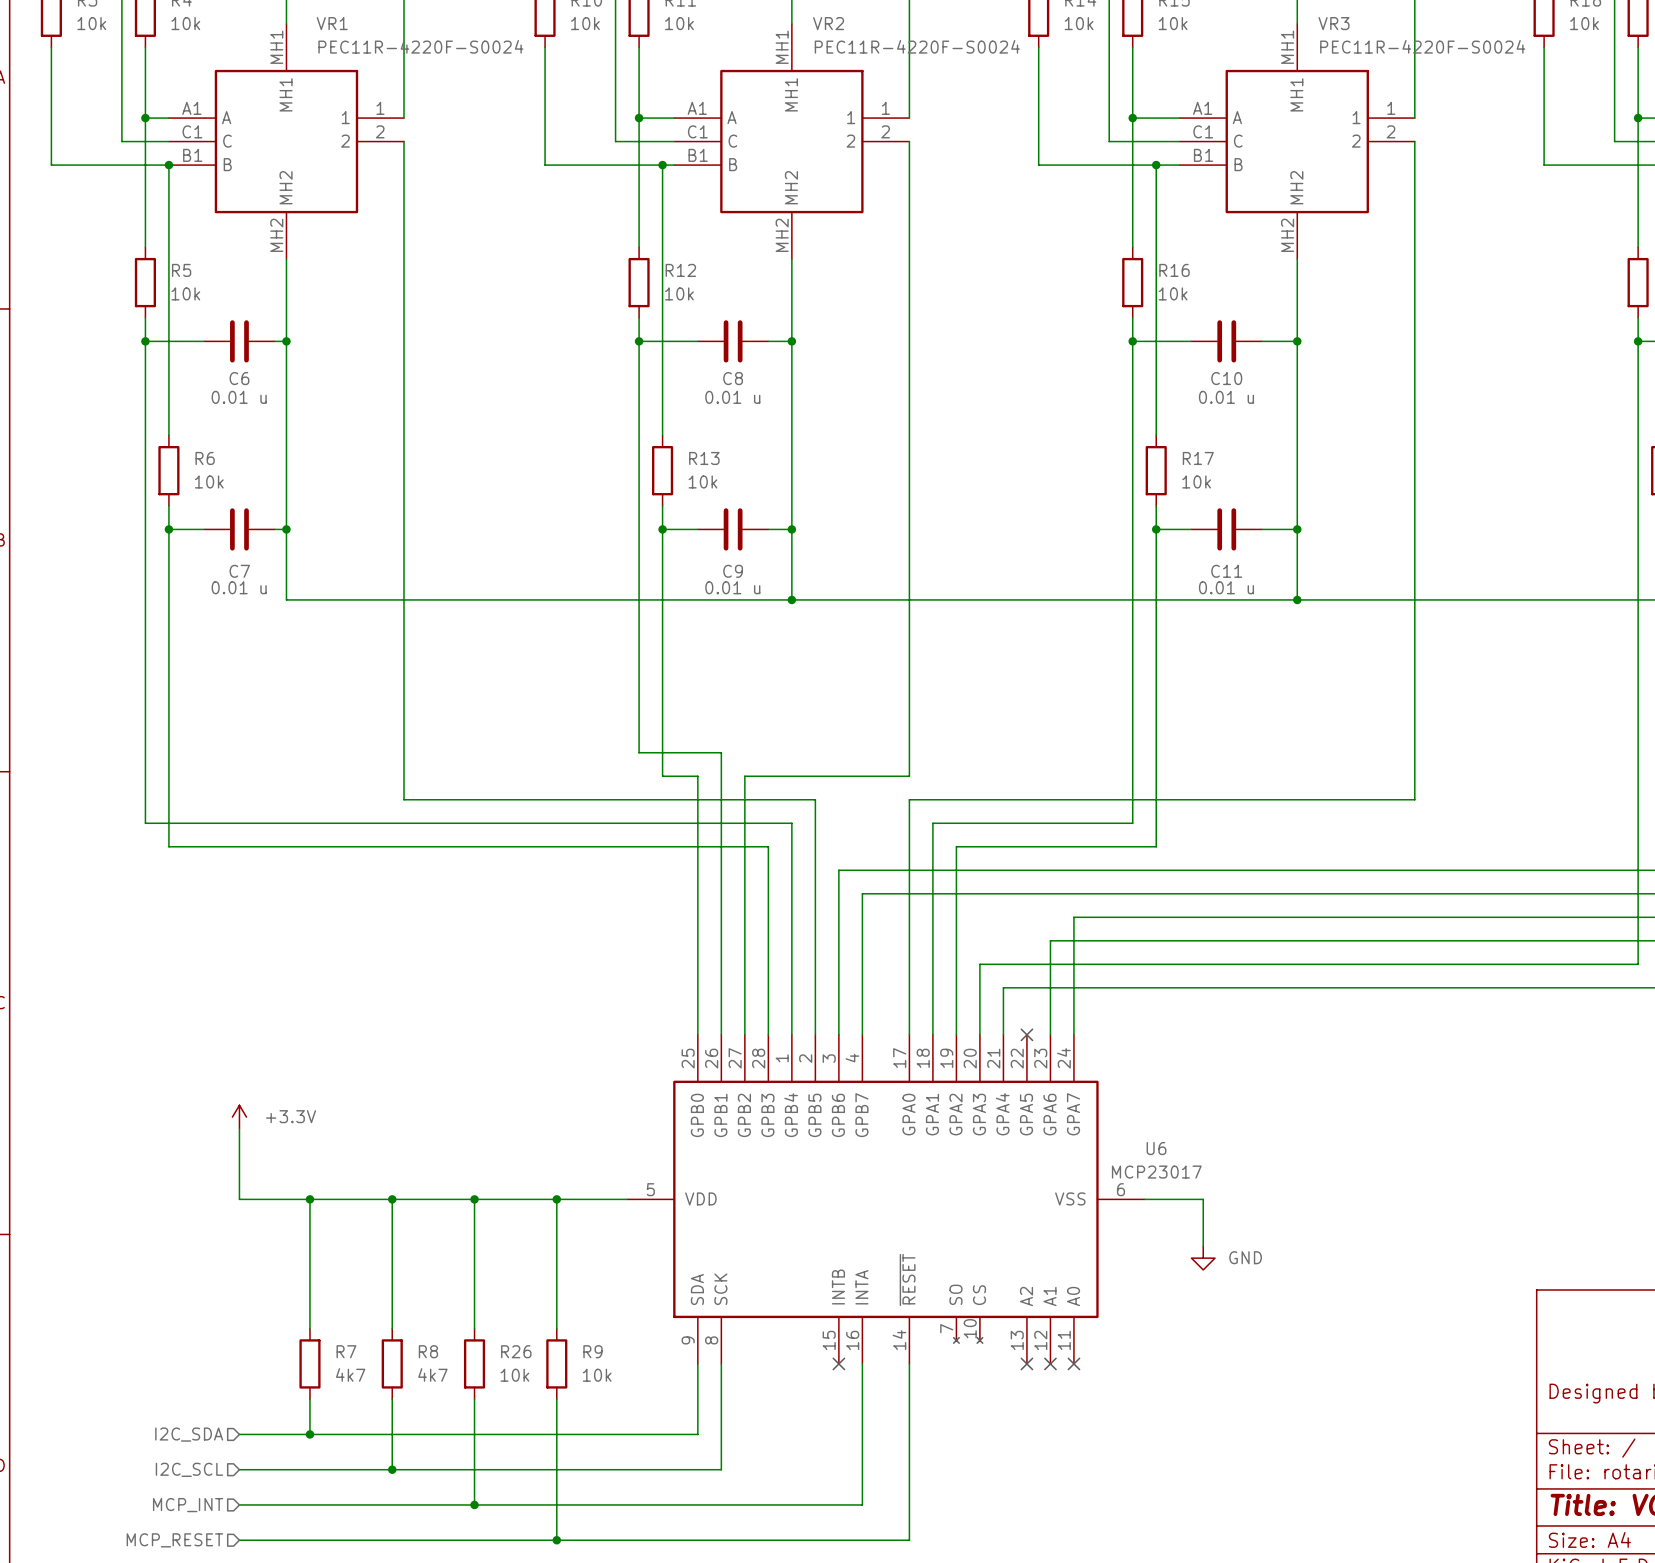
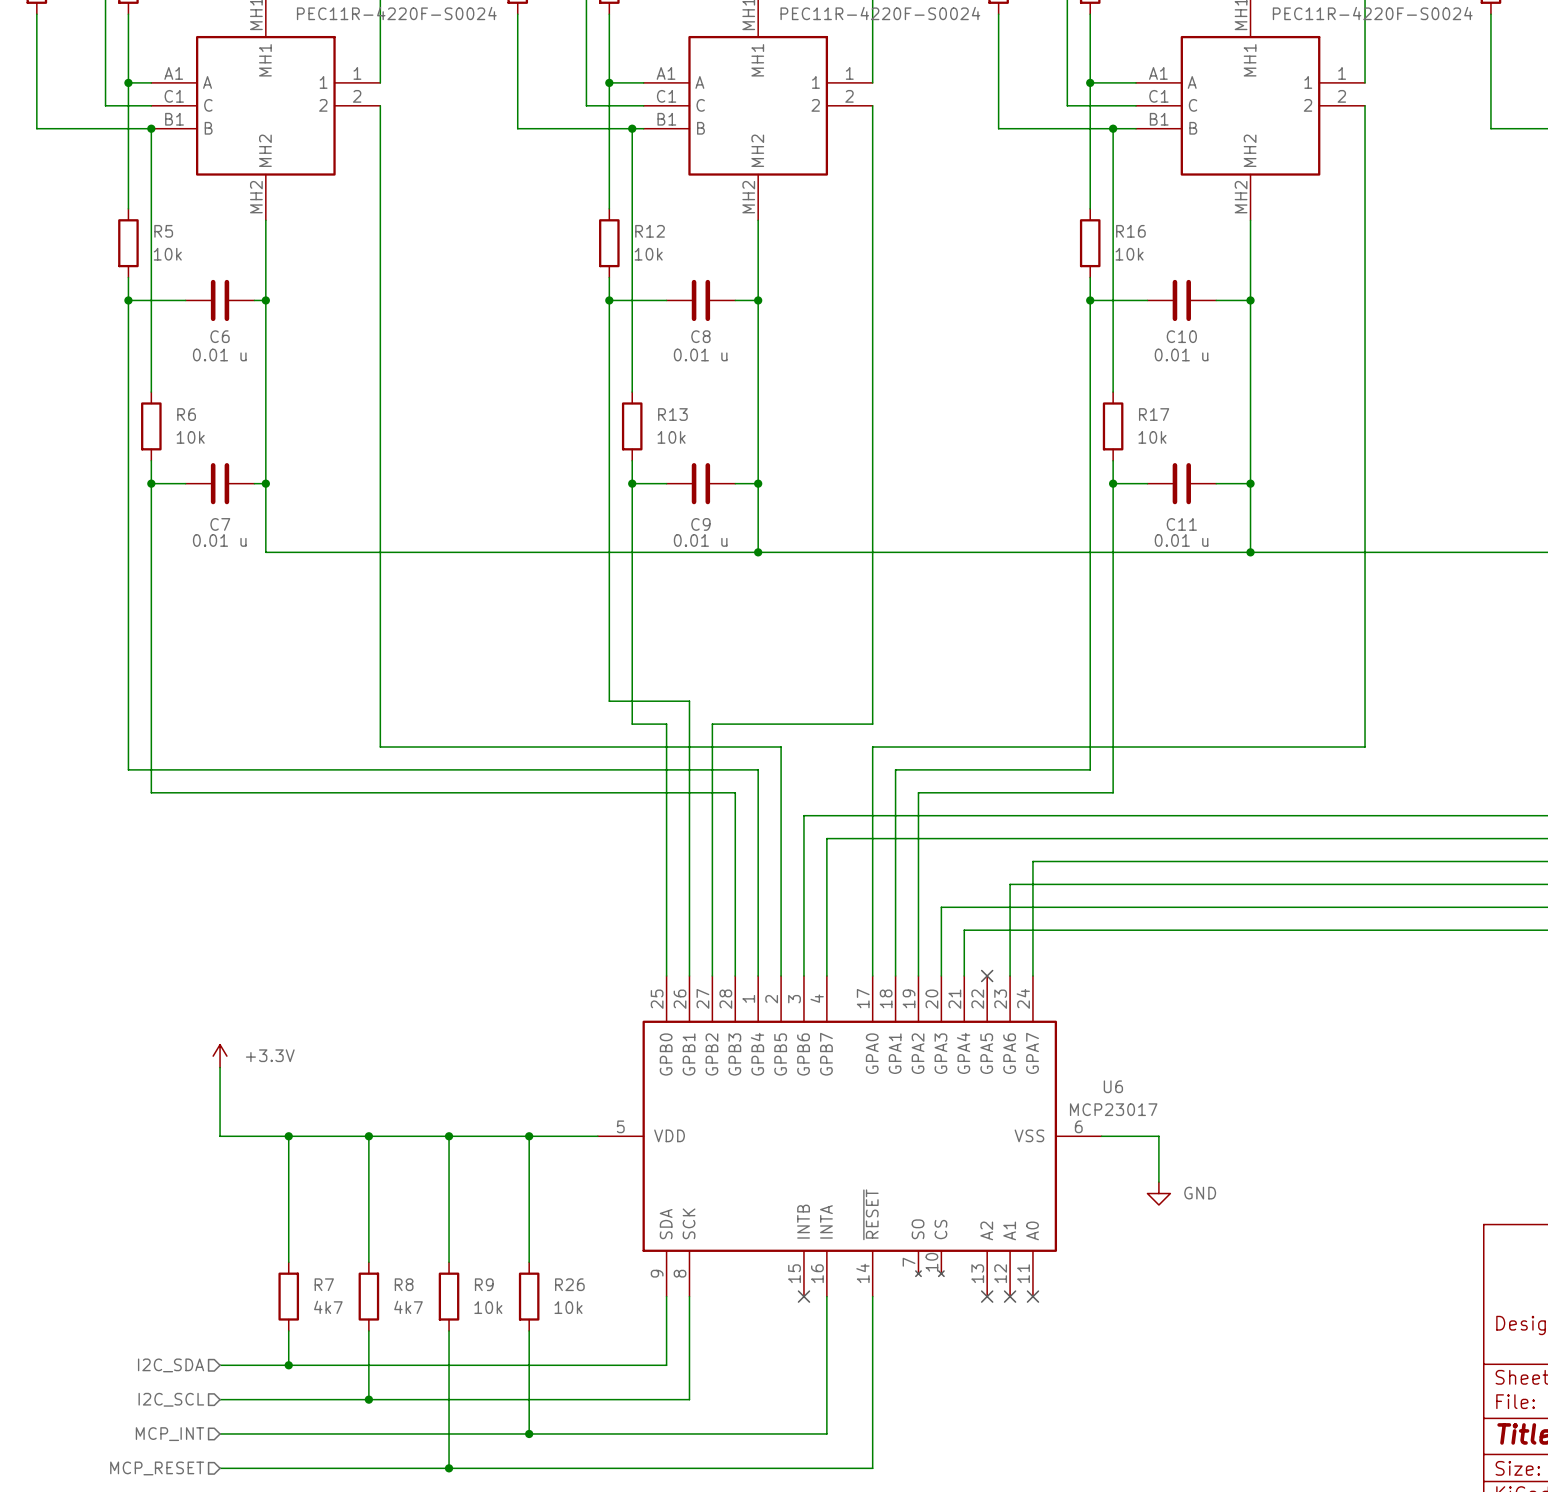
R26 name: R26 (516, 1351) -> R9 (484, 1284)
R9 name: R9 (592, 1351) -> R26 (569, 1284)
junction position: (474, 1504) -> (449, 1468)
wire: (556, 1504) (556, 1540) -> (449, 1433) (449, 1468)
junction position: (556, 1540) -> (529, 1433)

